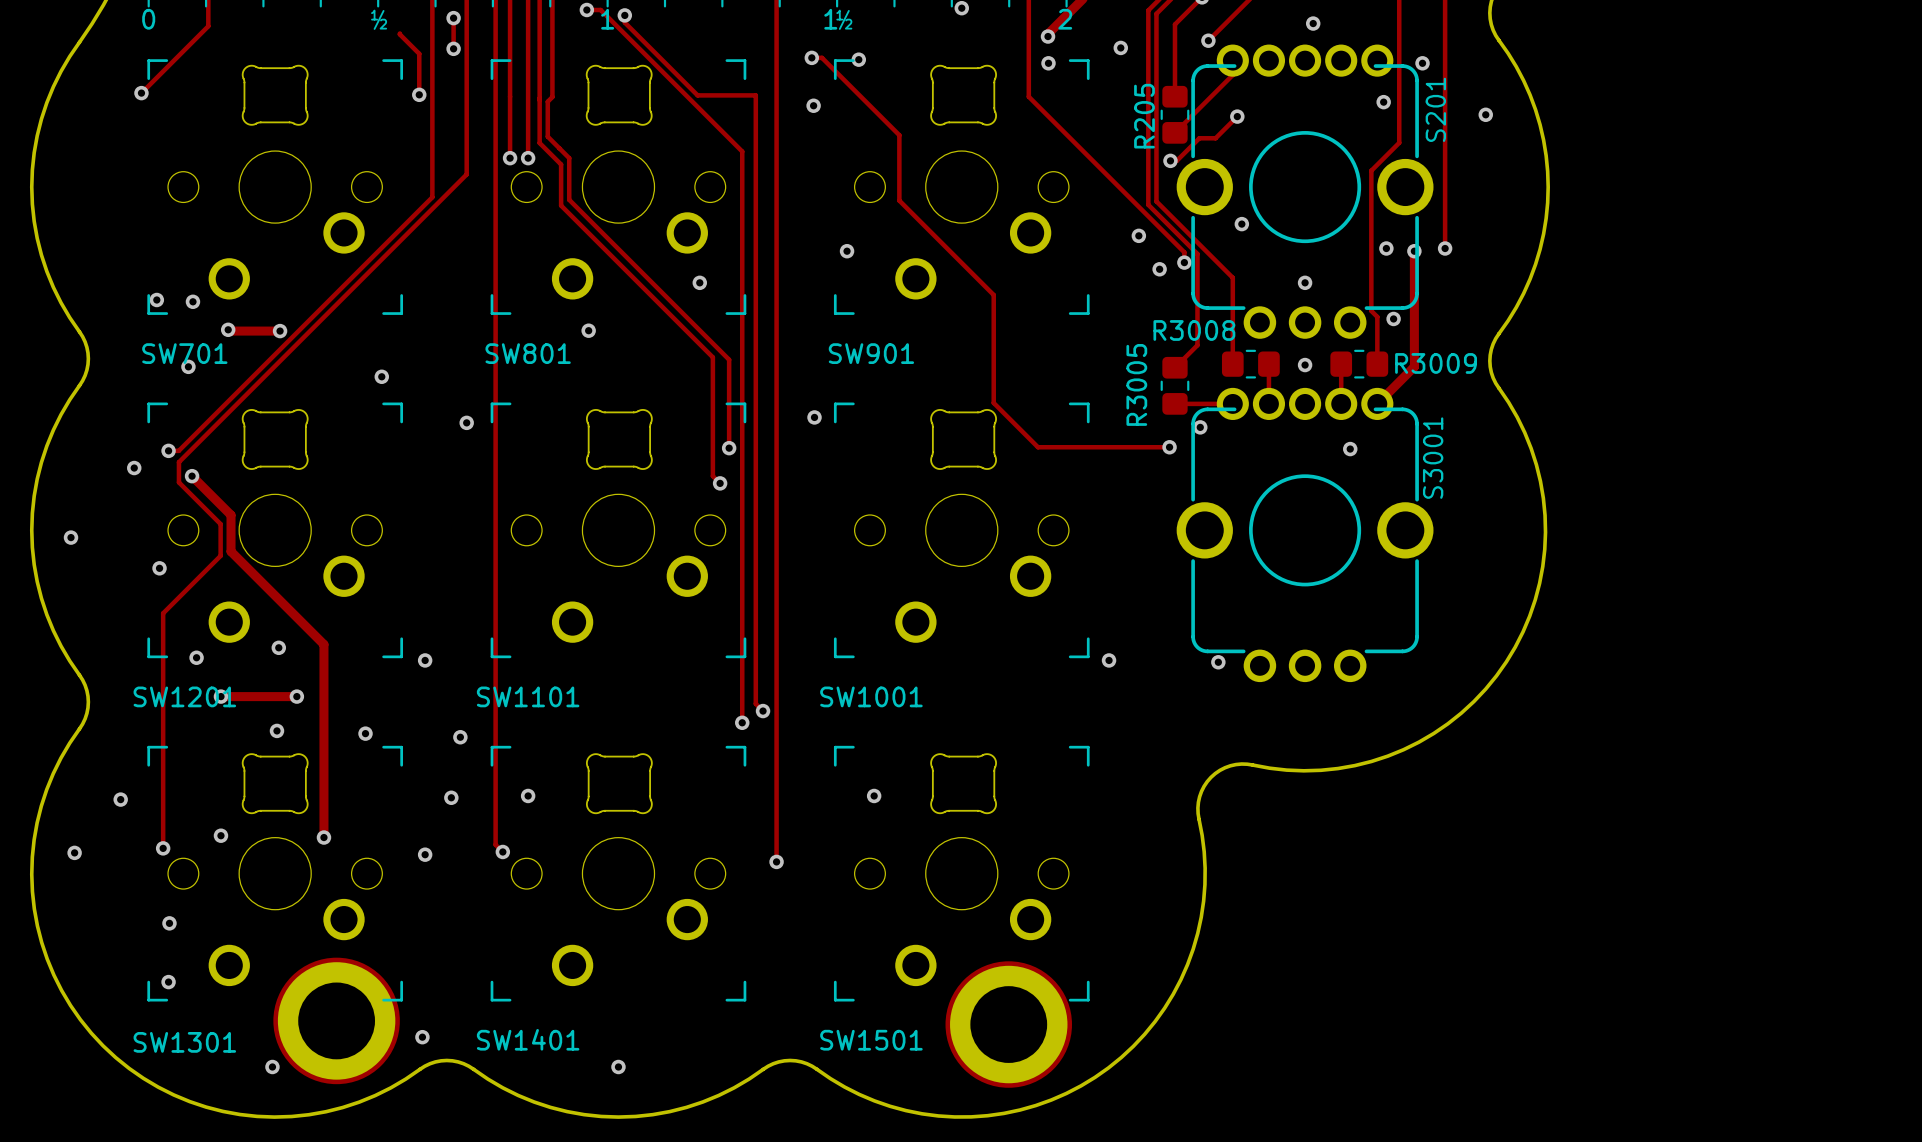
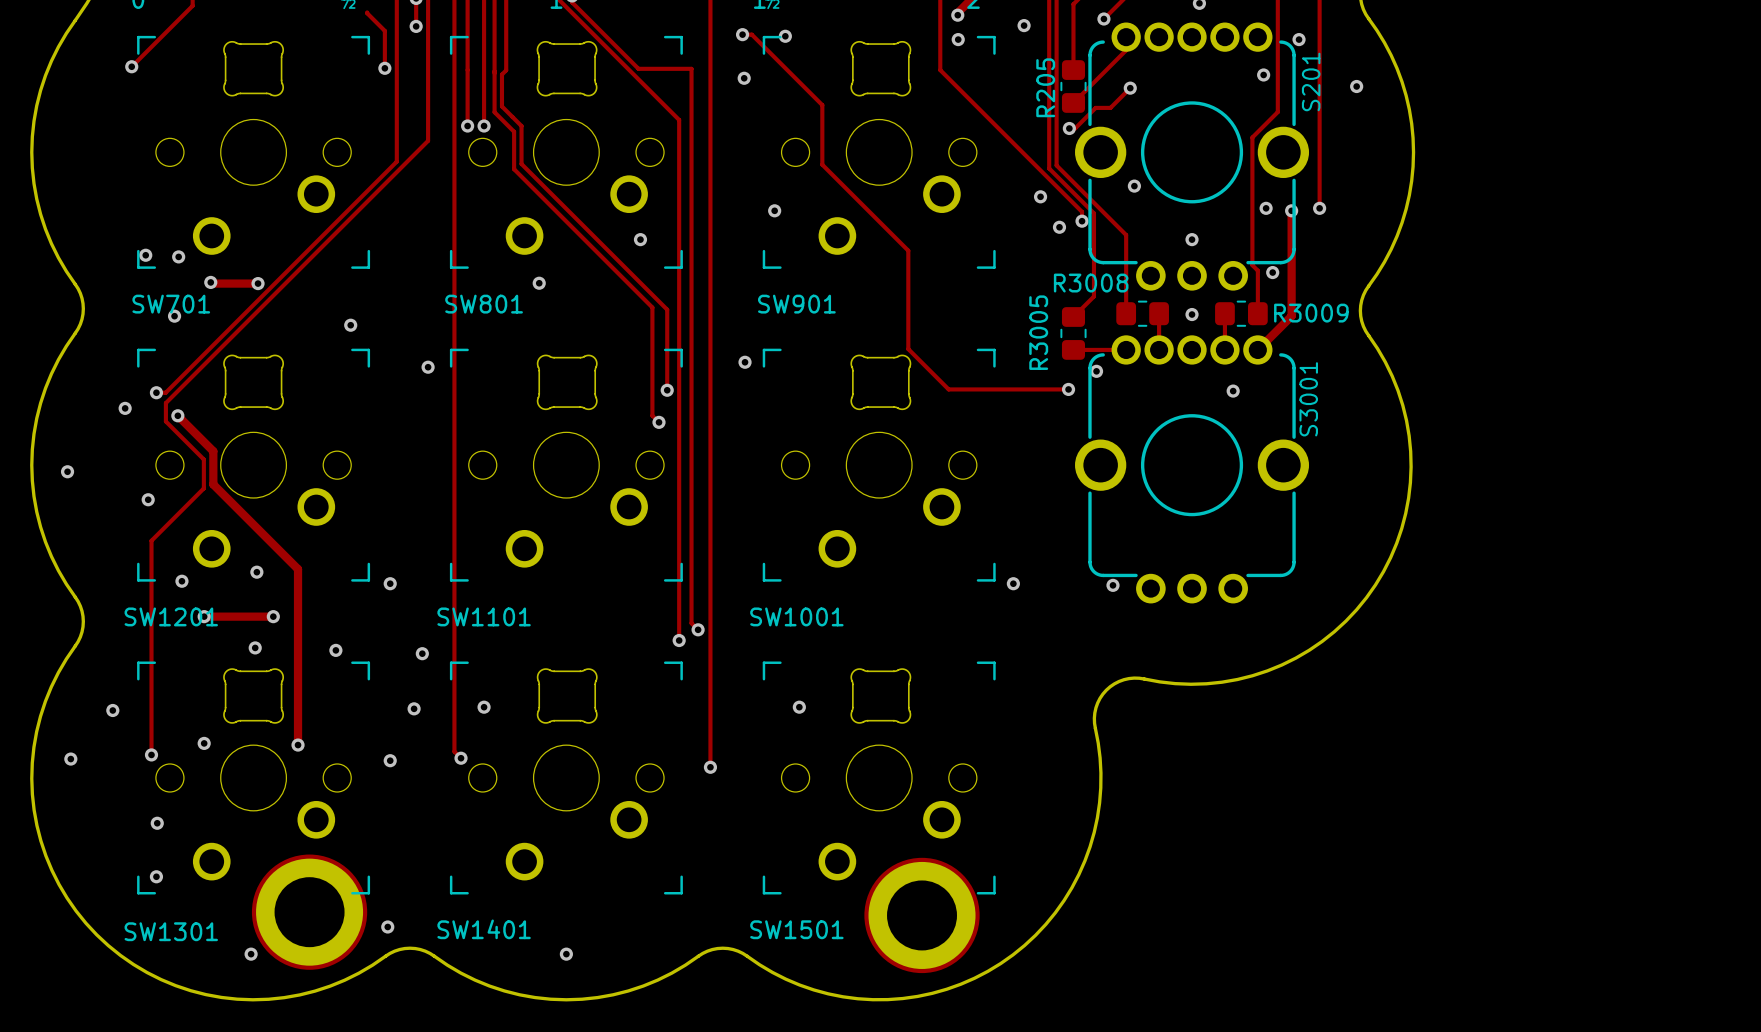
S201 footprint: [1176, 44, 1434, 339] -> [1075, 22, 1310, 291]
S3001 footprint: [1176, 387, 1434, 683] -> [1075, 335, 1310, 604]

